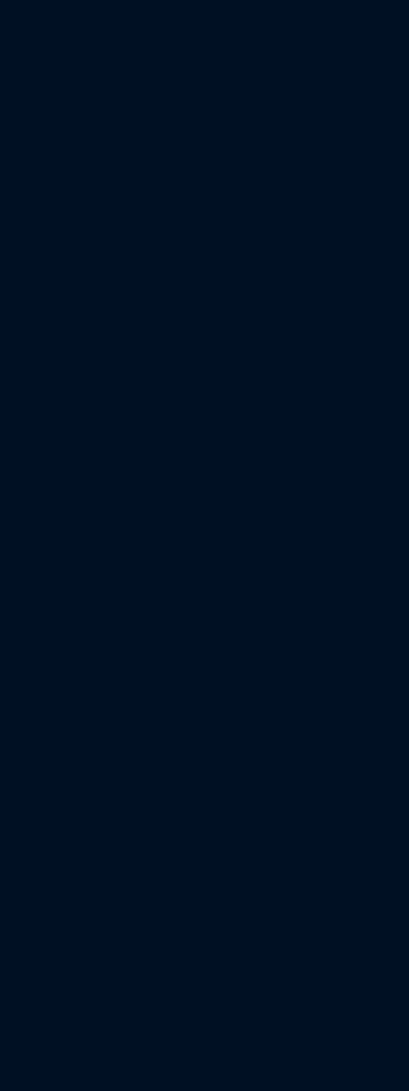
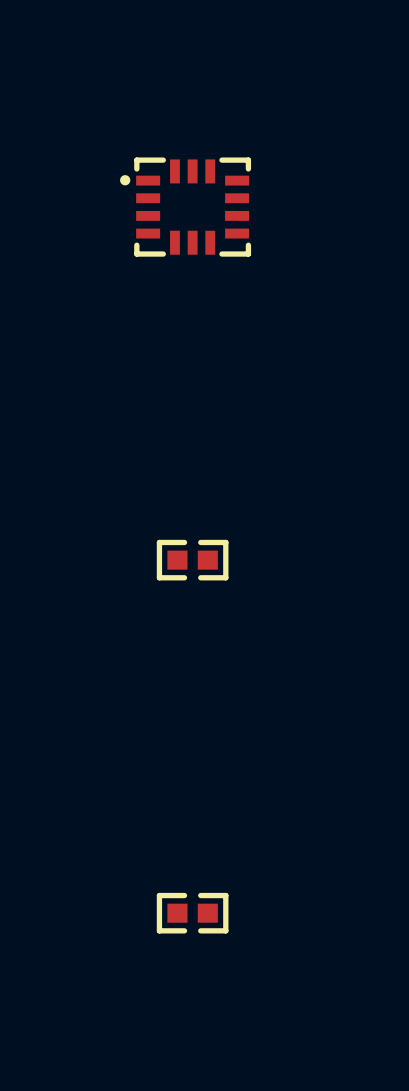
part: none -> (185, 207)
part: none -> (192, 560)
part: none -> (192, 913)

